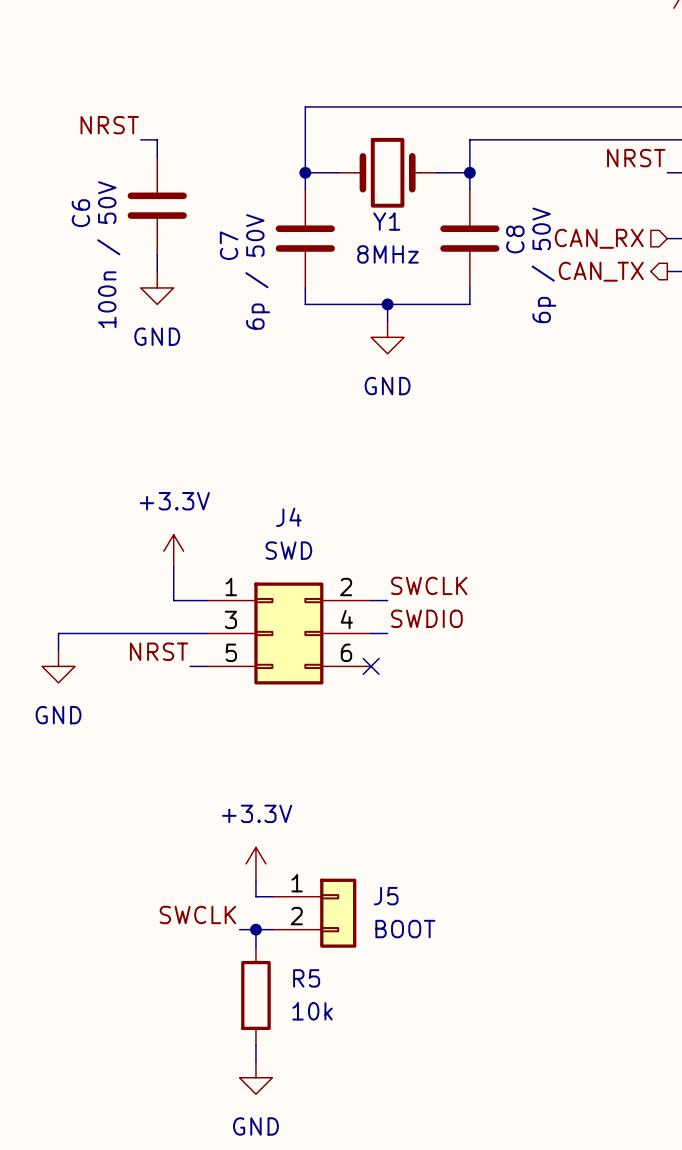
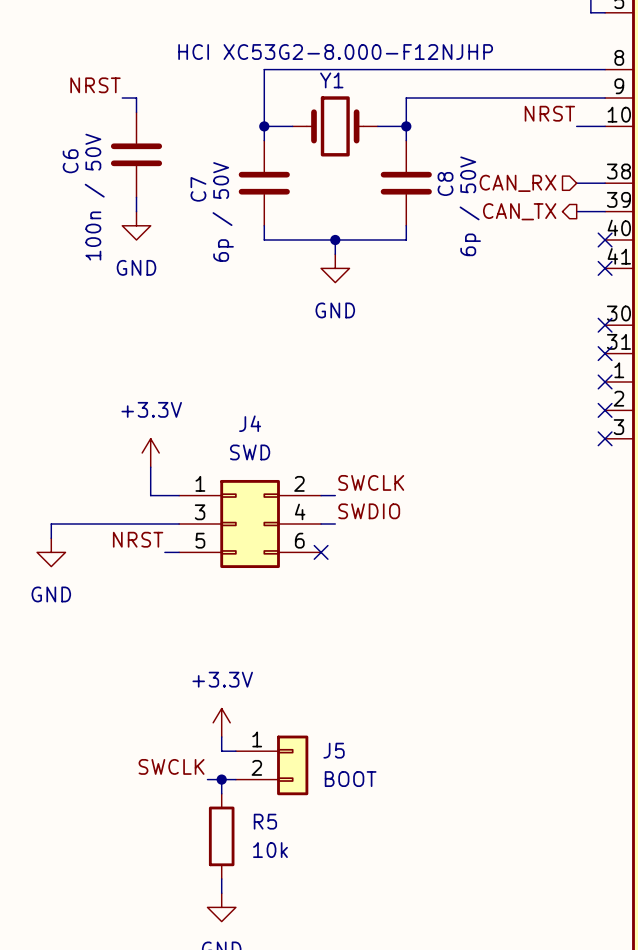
Y1 name position: Y1 (386, 221) -> Y1 (331, 80)
Y1 value: 8MHz (387, 254) -> HCI XC53G2-8.000-F12NJHP (335, 52)

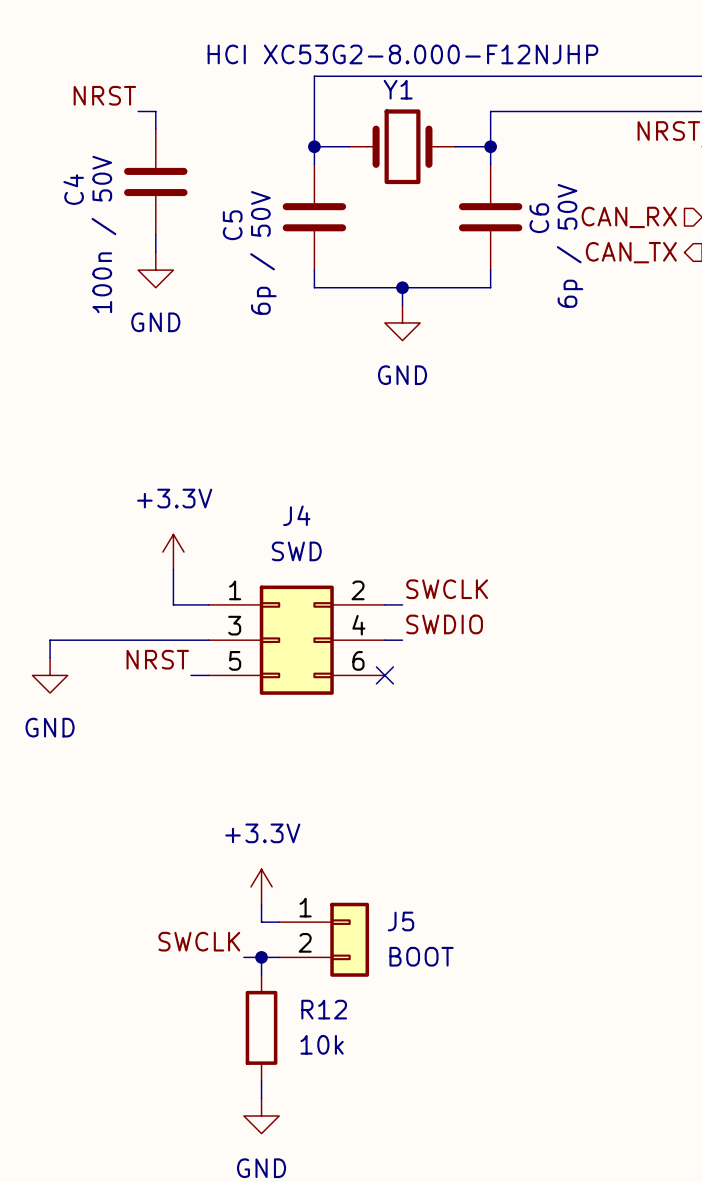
C6 name: C6 (70, 161) -> C4 (73, 189)
C8 name: C8 (445, 183) -> C6 (539, 218)
C7 name: C7 (198, 189) -> C5 (232, 225)
R5 name: R5 (265, 821) -> R12 (324, 1009)

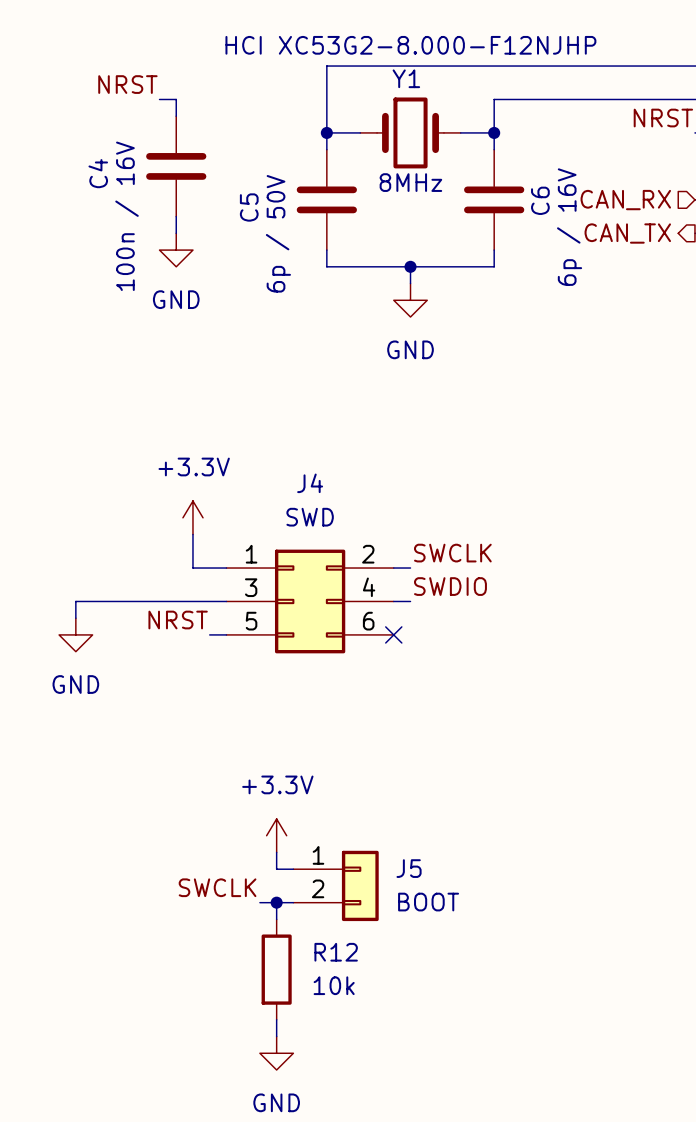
text: none -> 8MHz (410, 182)
C4 value: 100n / 50V (103, 234) -> 100n / 16V (127, 216)
C6 value: 6p / 50V (570, 245) -> 6p / 16V (569, 227)

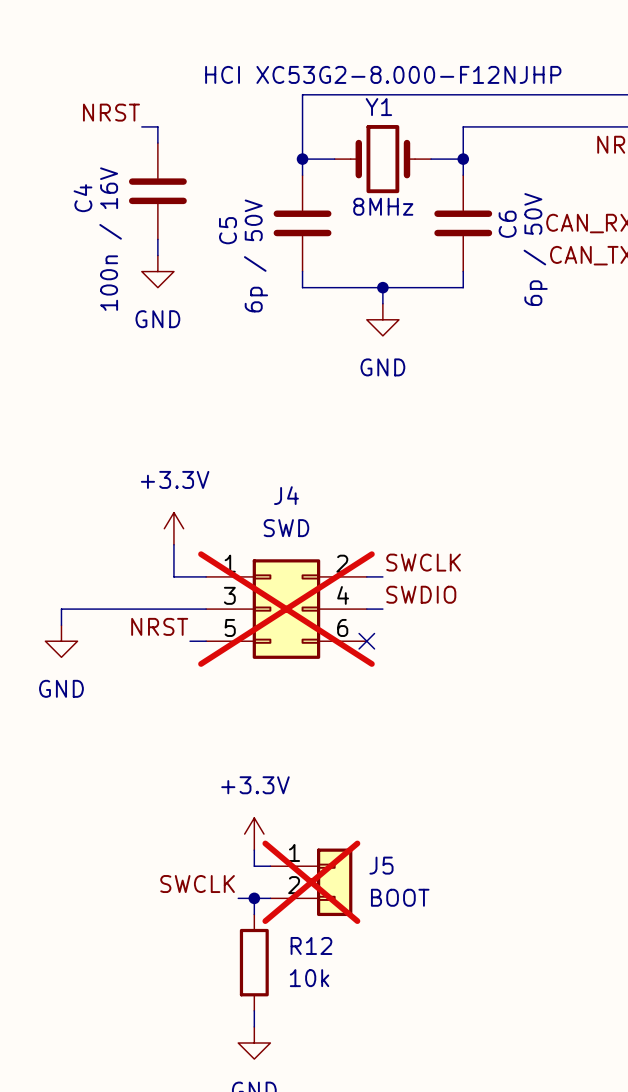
C6 value: 6p / 16V (569, 227) -> 6p / 50V (535, 249)
J4 do-not-place cross: none -> (286, 609)
J5 do-not-place cross: none -> (311, 882)

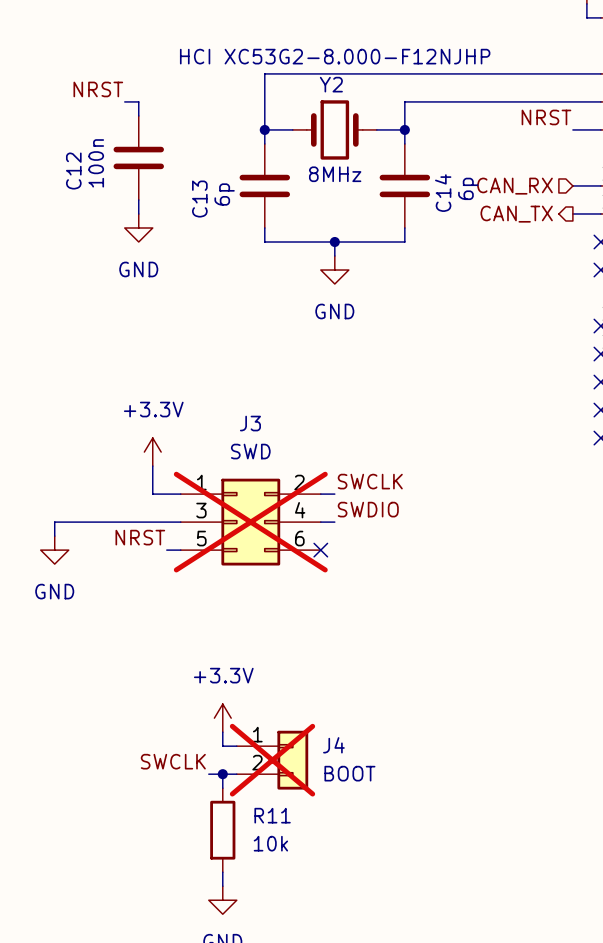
Y1 name: Y1 (378, 107) -> Y2 (331, 84)
C4 name: C4 (82, 198) -> C12 (73, 171)
text: 8MHz (383, 206) -> none
Y1 text: none -> 8MHz (335, 174)
C6 name: C6 (507, 224) -> C14 (443, 193)
C5 name: C5 (228, 230) -> C13 (199, 199)
C4 value: 100n / 16V (110, 239) -> 100n (96, 163)
C6 value: 6p / 50V (535, 249) -> 6p (468, 188)
C5 value: 6p / 50V (256, 255) -> 6p (224, 194)
J4 name: J4 (286, 495) -> J3 (250, 423)
J5 name: J5 (381, 865) -> J4 (333, 745)
R12 name: R12 (311, 945) -> R11 (272, 815)

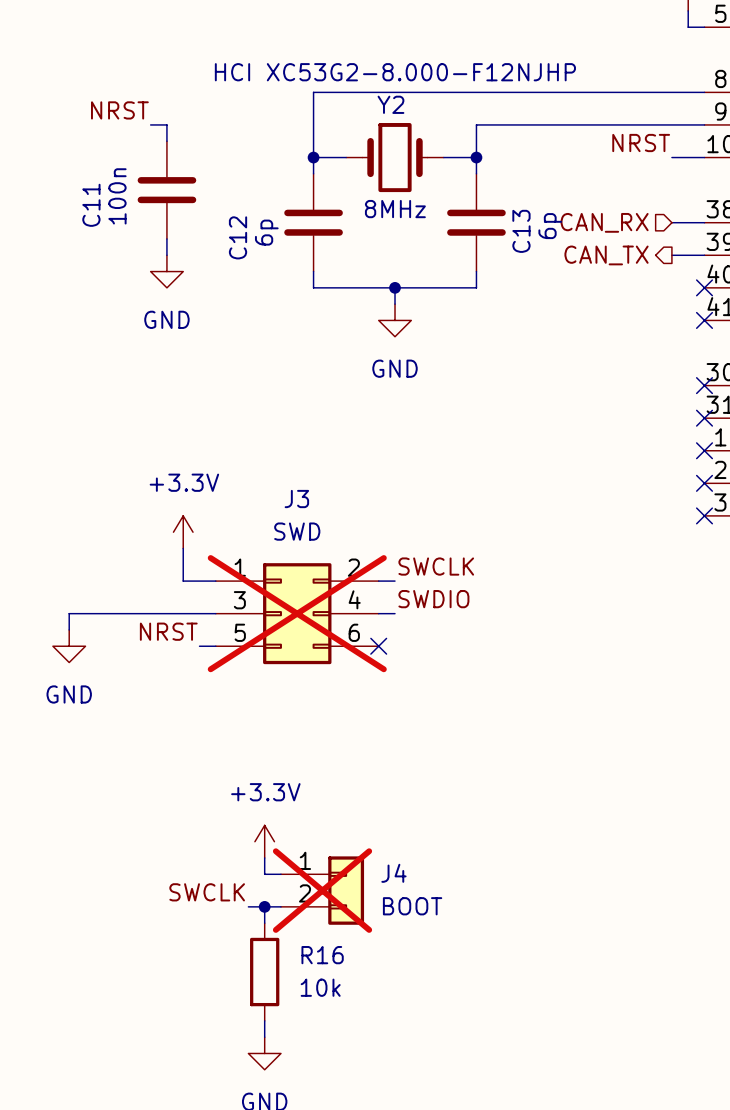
C12 name: C12 (73, 171) -> C11 (91, 205)
C14 name: C14 (443, 193) -> C13 (521, 231)
C13 name: C13 (199, 199) -> C12 (238, 237)
R11 name: R11 (272, 815) -> R16 (322, 955)

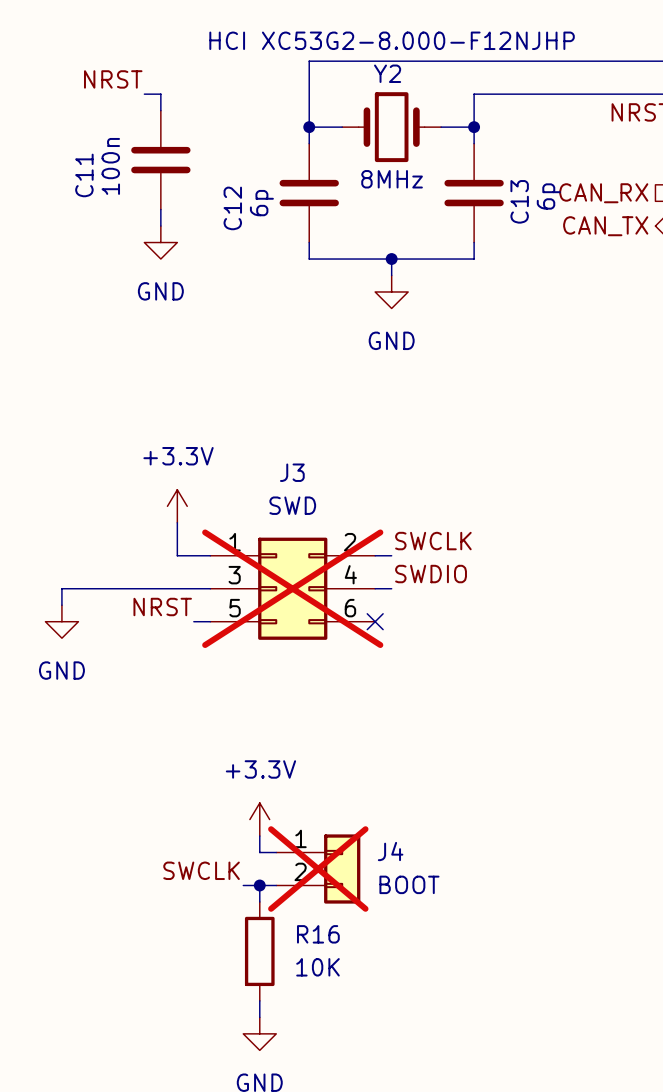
R16 value: 10k (320, 987) -> 10K (317, 967)

